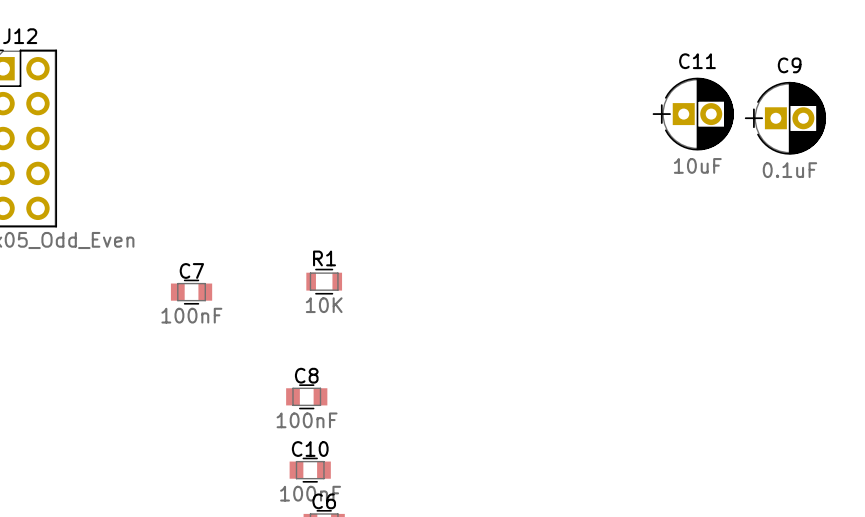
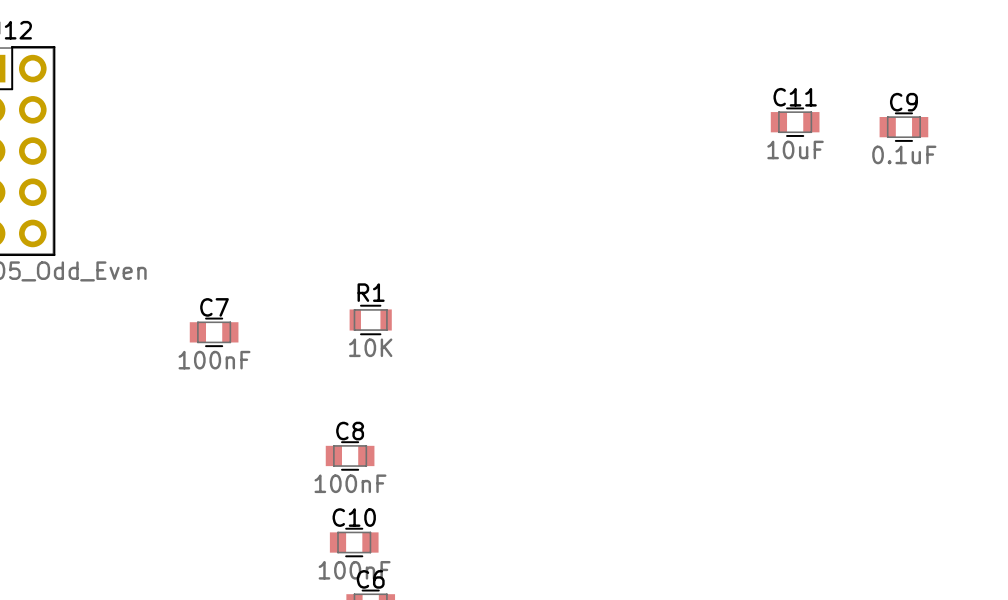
C11 name position: C11 (697, 61) -> C11 (795, 97)
C9 name position: C9 (789, 65) -> C9 (903, 102)
C11 footprint: [652, 77, 734, 151] -> [770, 107, 820, 137]
C9 footprint: [744, 81, 827, 155] -> [879, 112, 929, 142]
C11 value position: 10uF (697, 165) -> 10uF (795, 149)
C9 value position: 0.1uF (789, 170) -> 0.1uF (904, 154)

